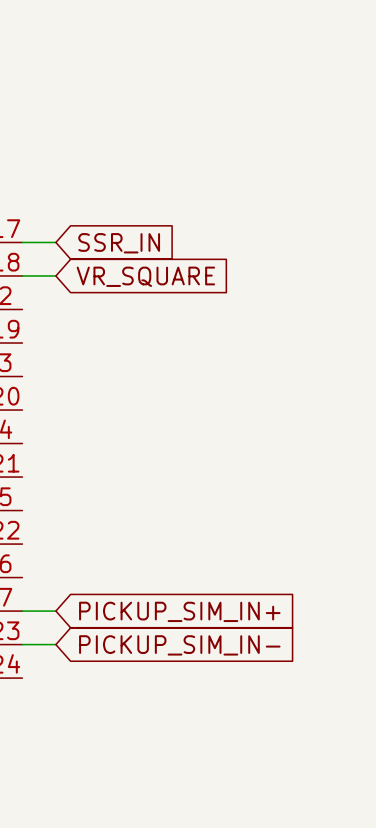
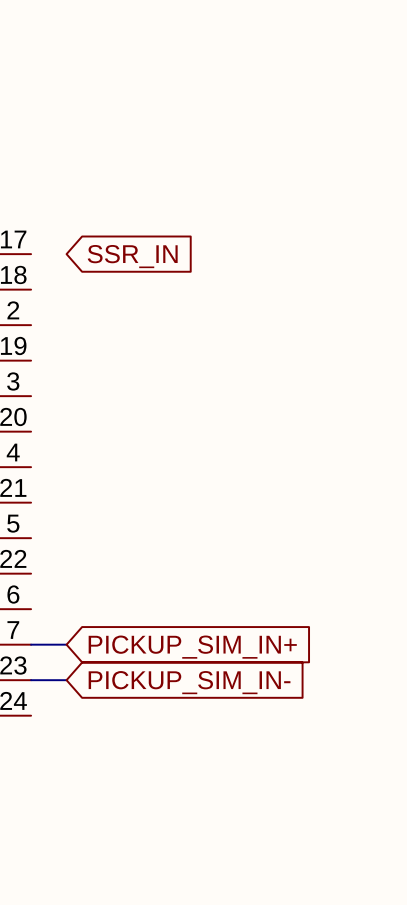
wire: (22, 242) (55, 242) -> none
wire: (22, 275) (55, 275) -> none
global label: VR_SQUARE (145, 276) -> none

